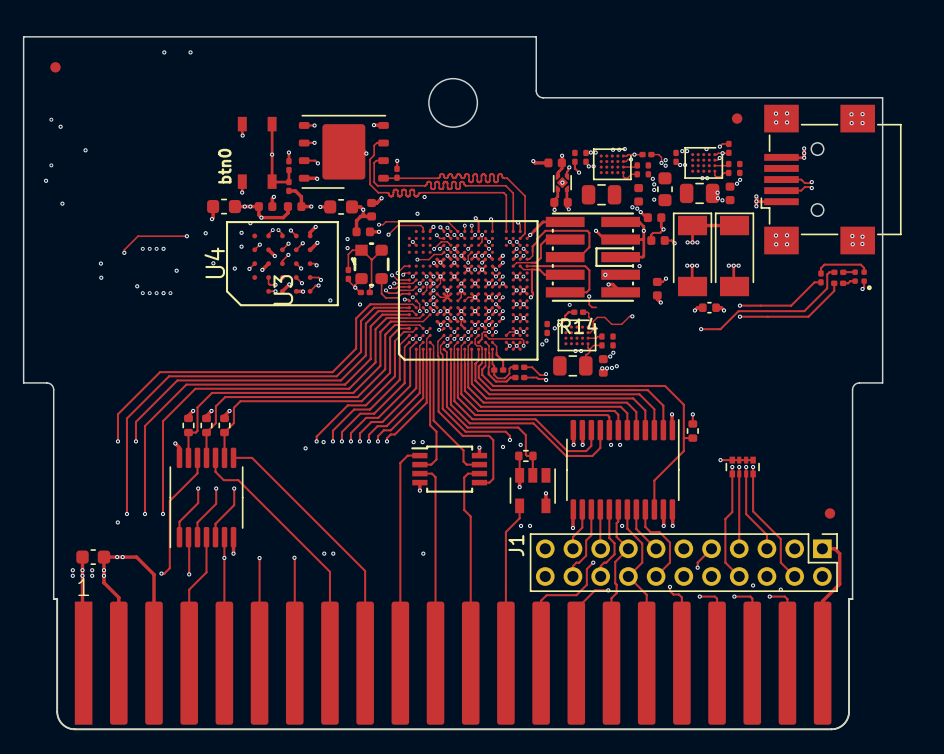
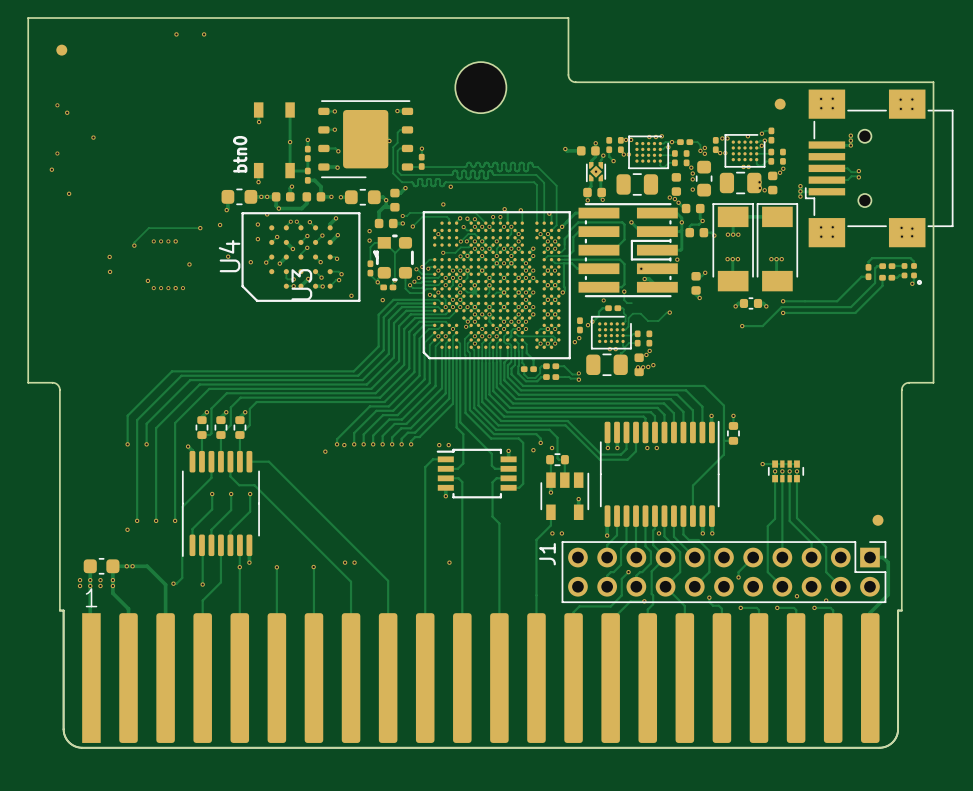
R14 name: R14 (579, 325) -> none

